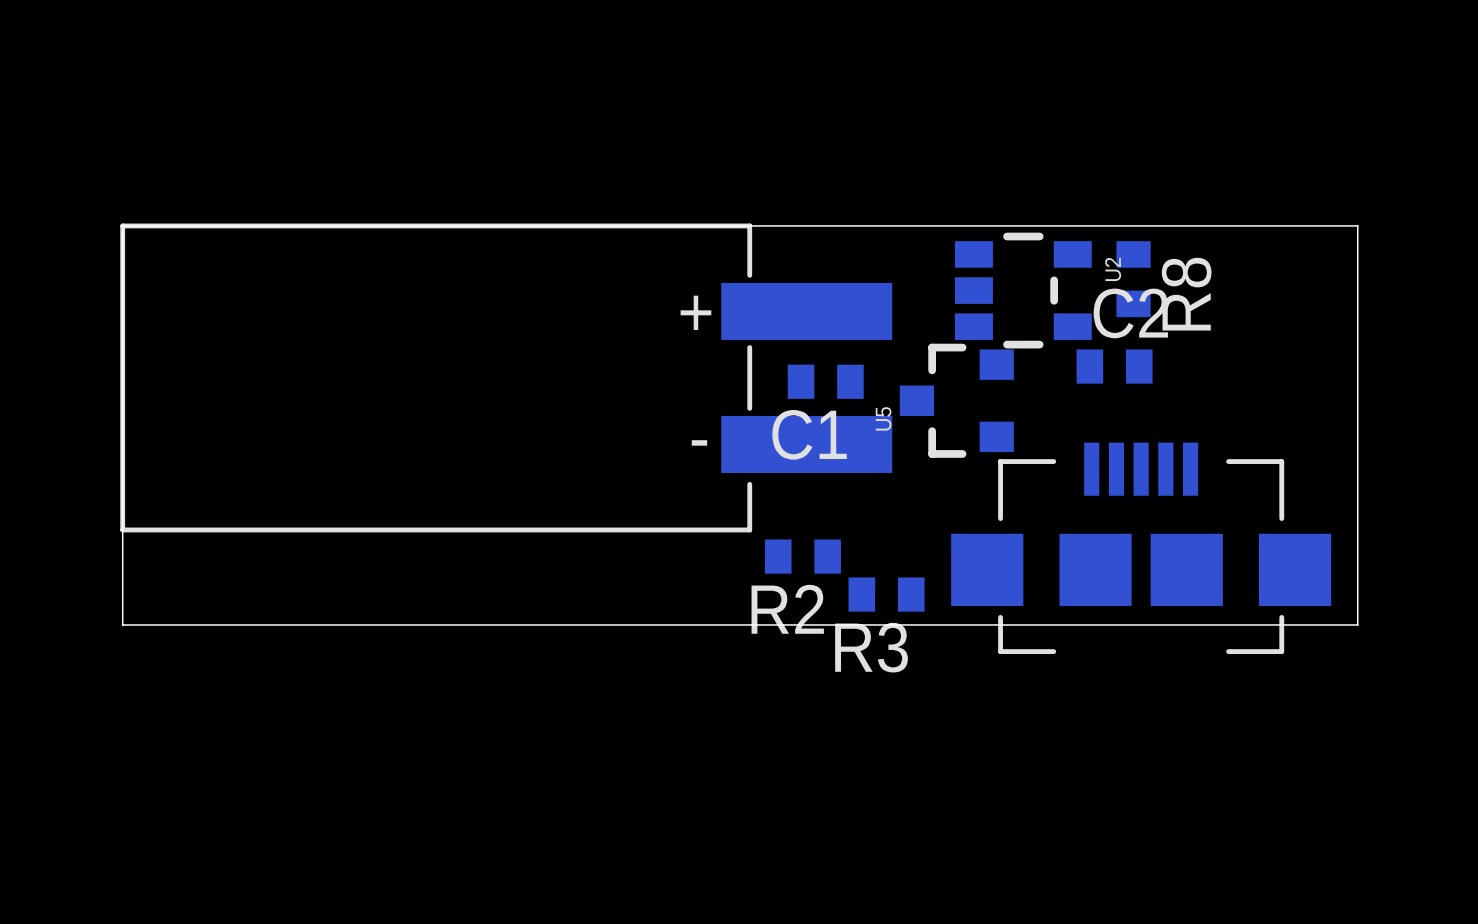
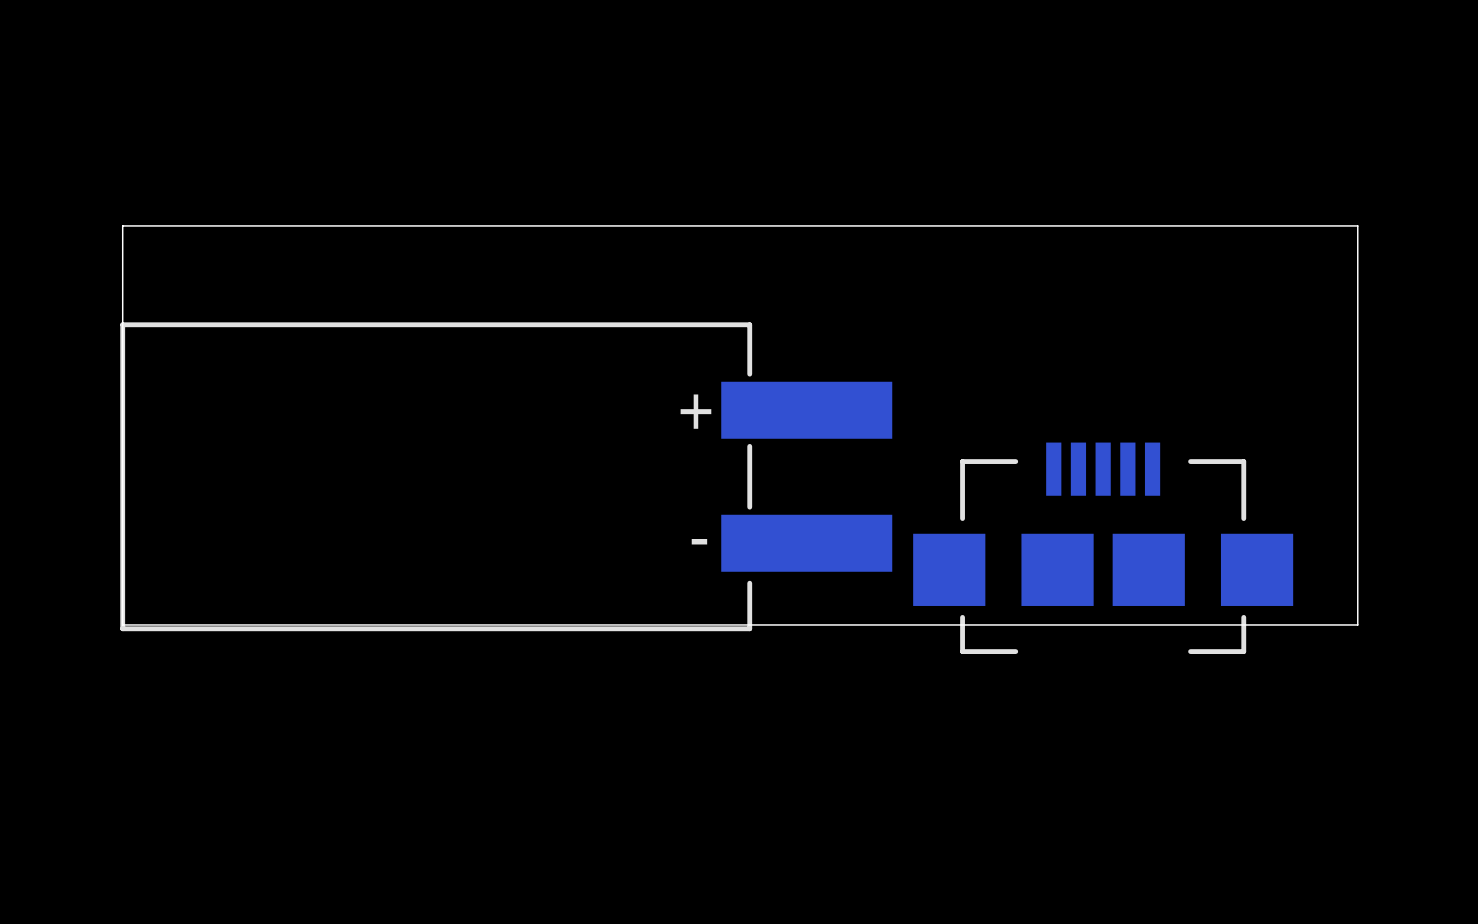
R8: (1133, 279) -> none
U2: (1023, 290) -> none
C2: (1114, 366) -> none
part position: (506, 377) -> (506, 476)
C1: (825, 381) -> none
U5: (956, 400) -> none
part position: (1141, 548) -> (1103, 548)
R2: (802, 556) -> none
R3: (886, 594) -> none

